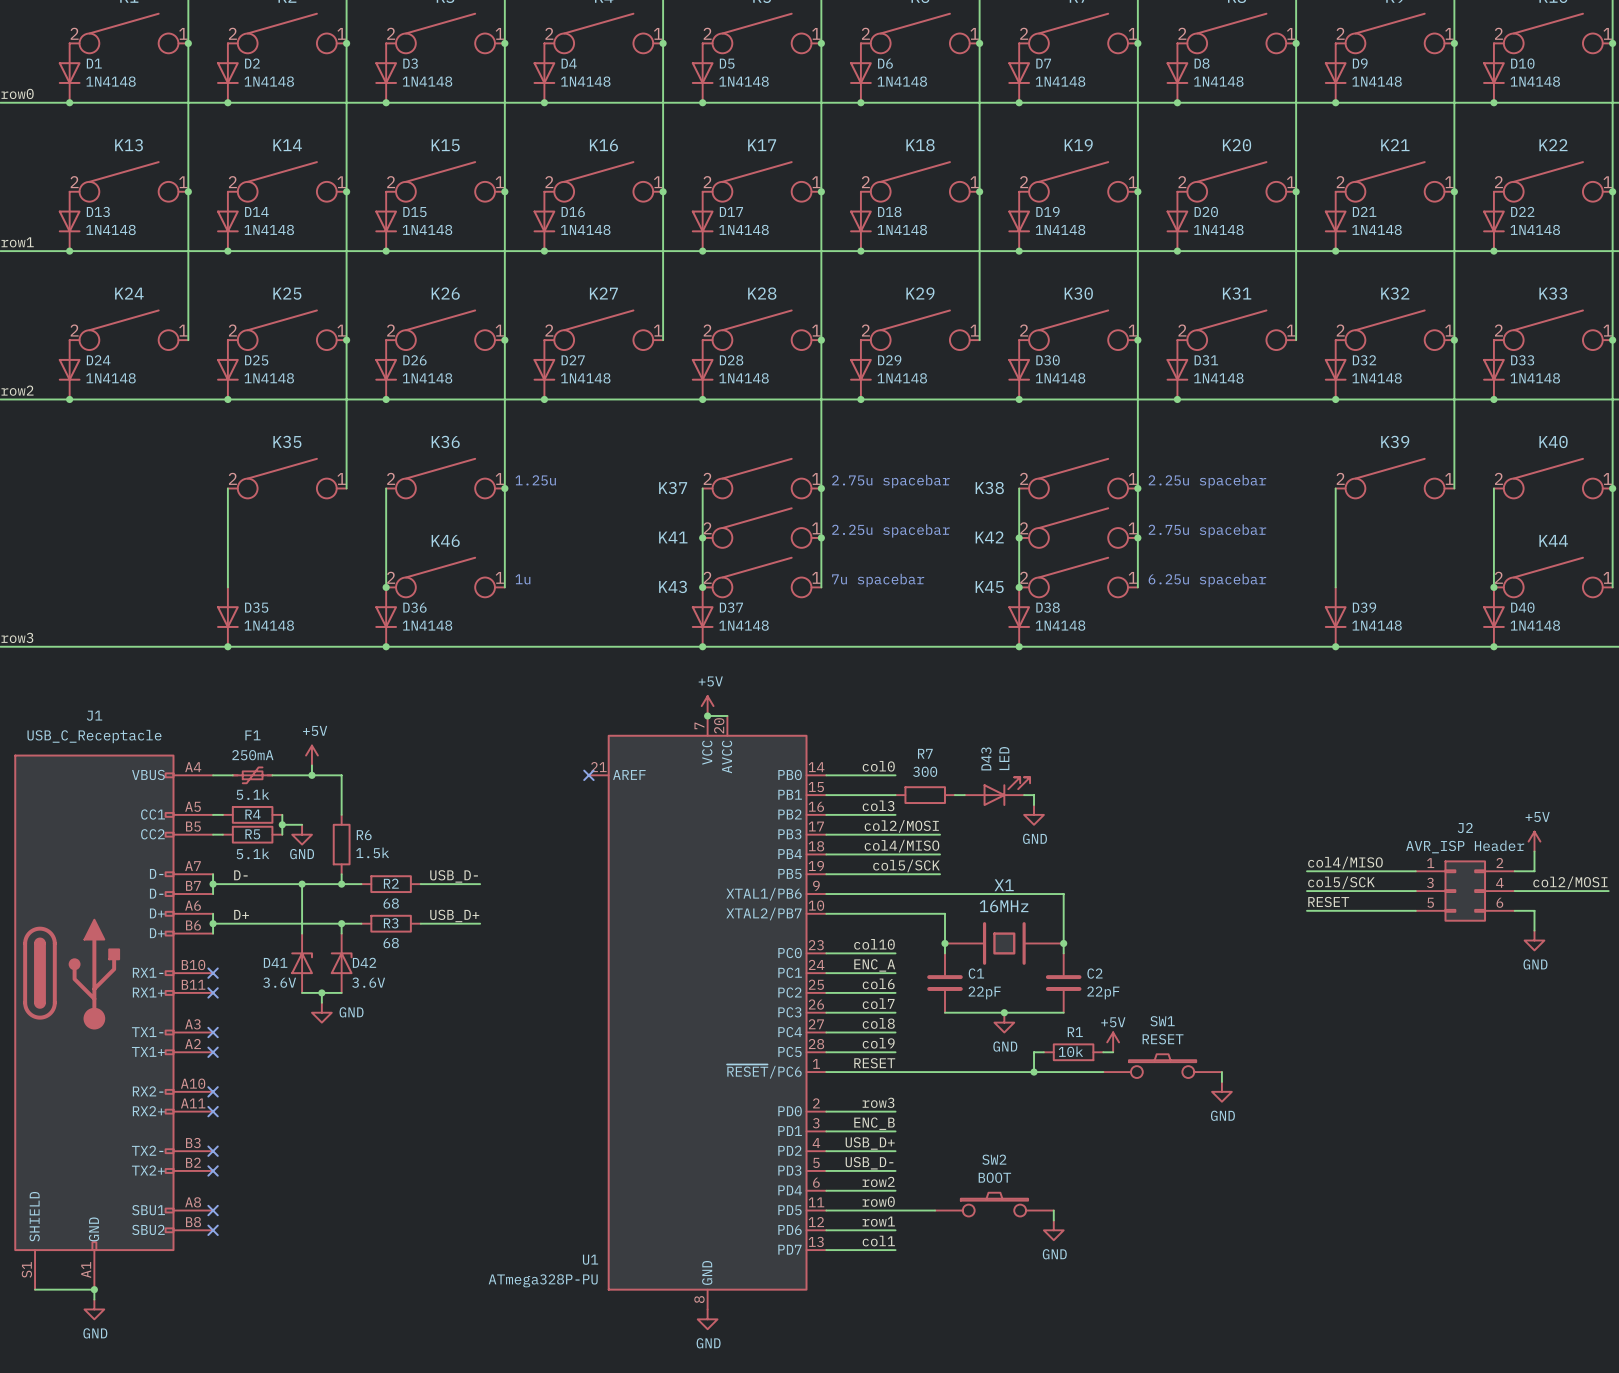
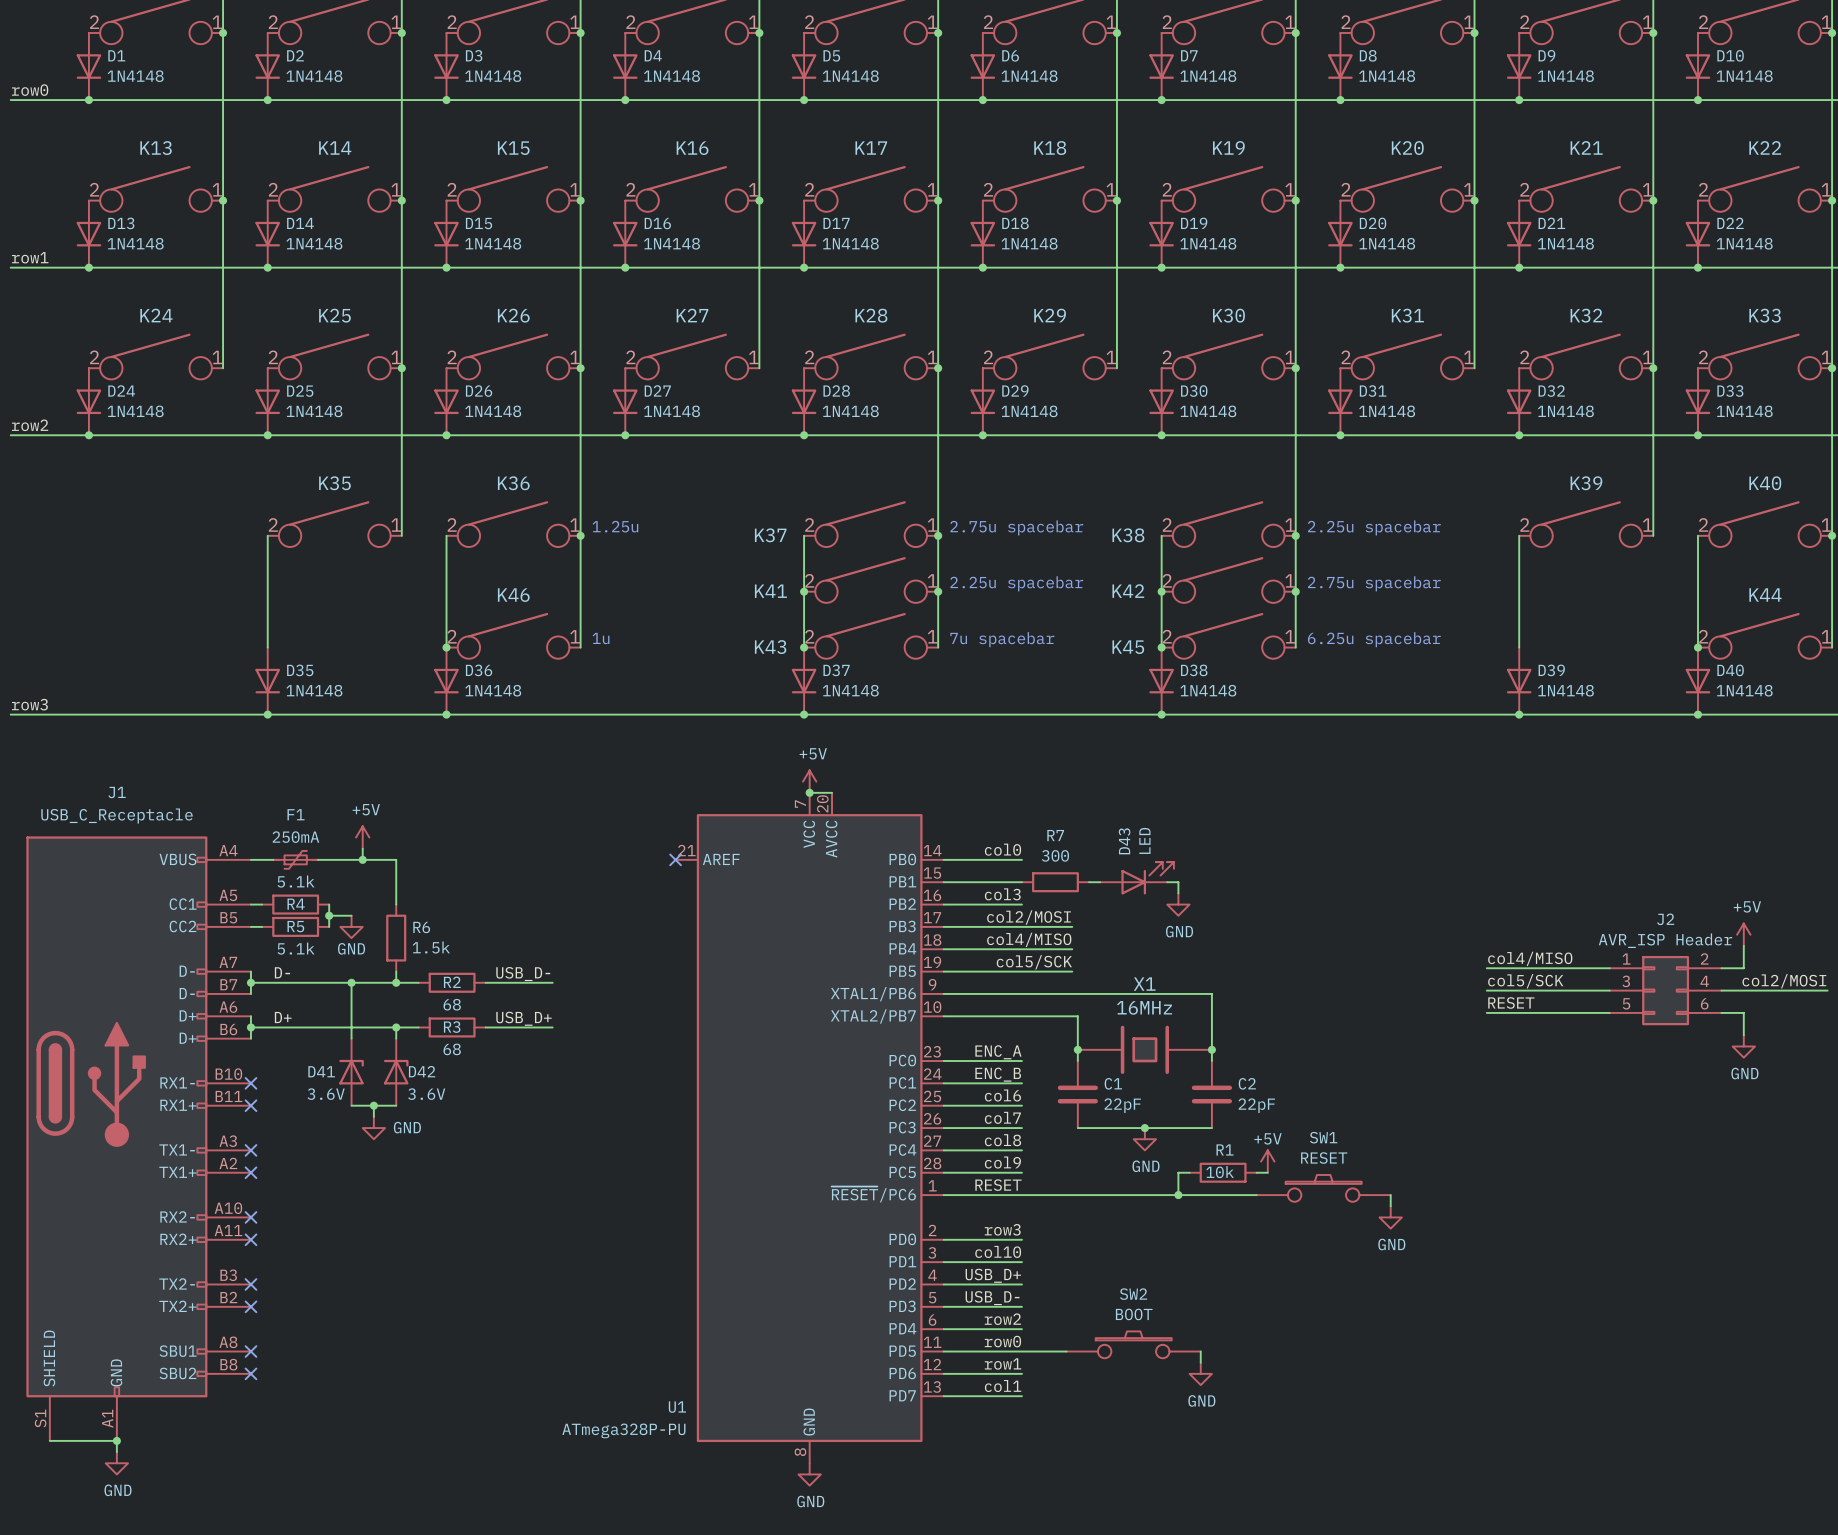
label: col10 (874, 944) -> ENC_A (998, 1052)
label: ENC_A (874, 965) -> ENC_B (998, 1074)
label: ENC_B (874, 1123) -> col10 (998, 1251)

